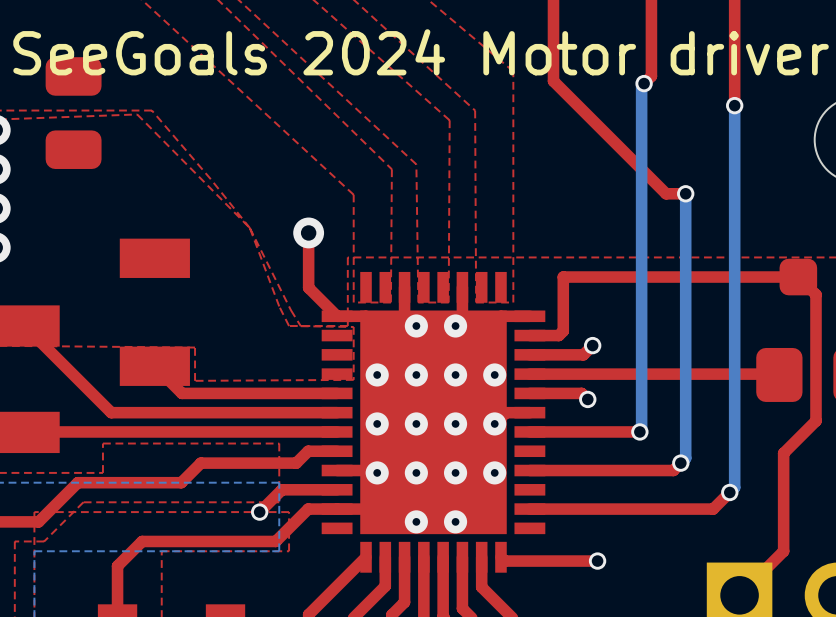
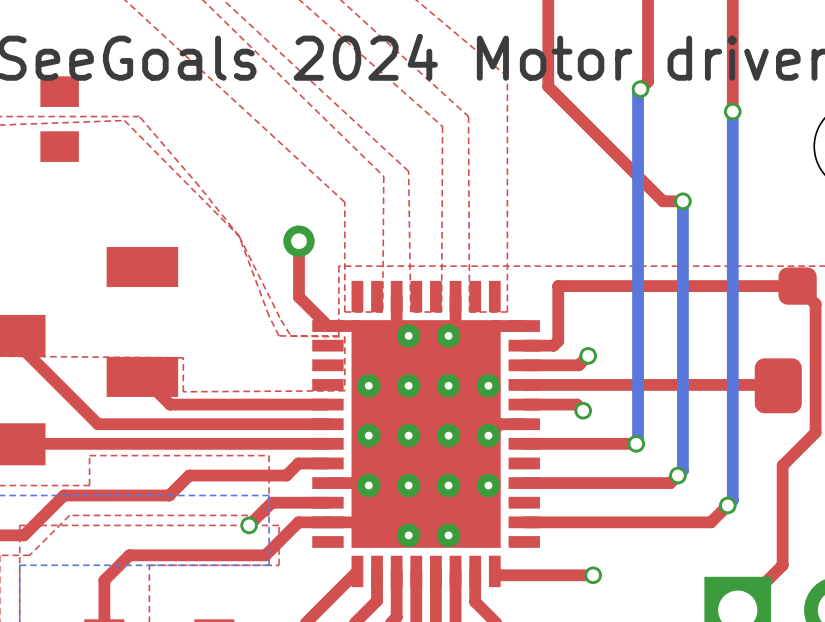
part footprint: [45, 57, 102, 169] -> [40, 76, 79, 162]

